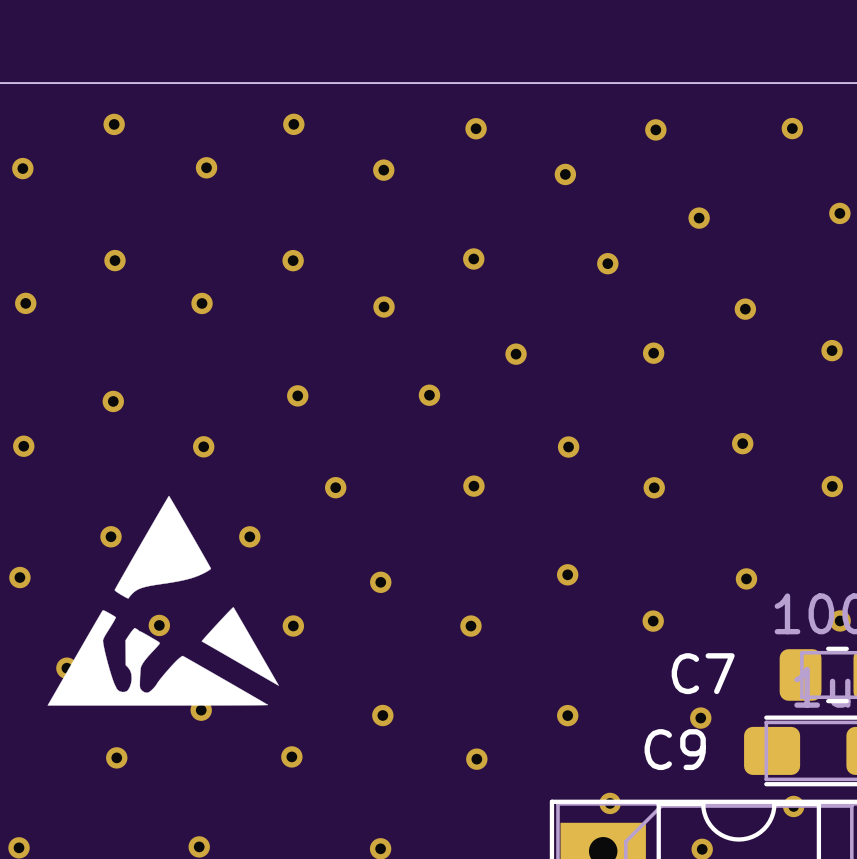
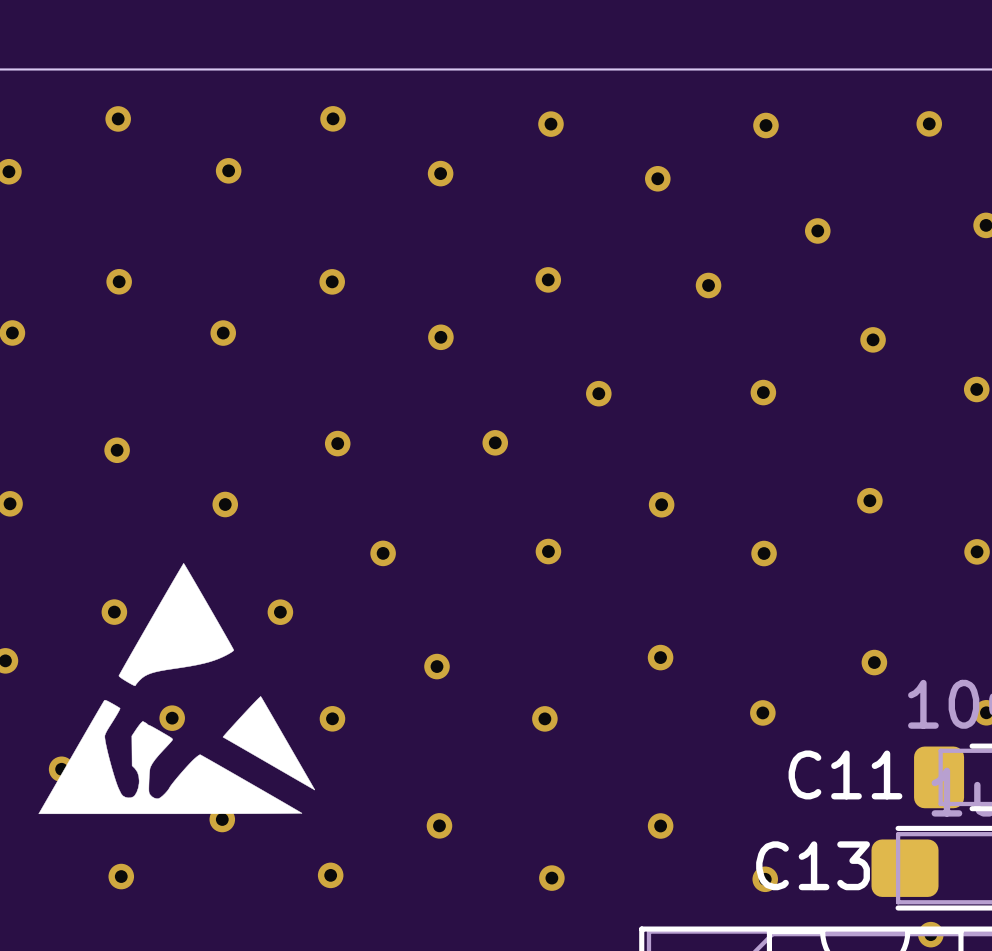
C7 name: C7 (703, 673) -> C11 (845, 774)
via: (700, 718) -> none
C9 name: C9 (675, 749) -> C13 (813, 865)
via: none -> (765, 879)
via: (610, 803) -> none

